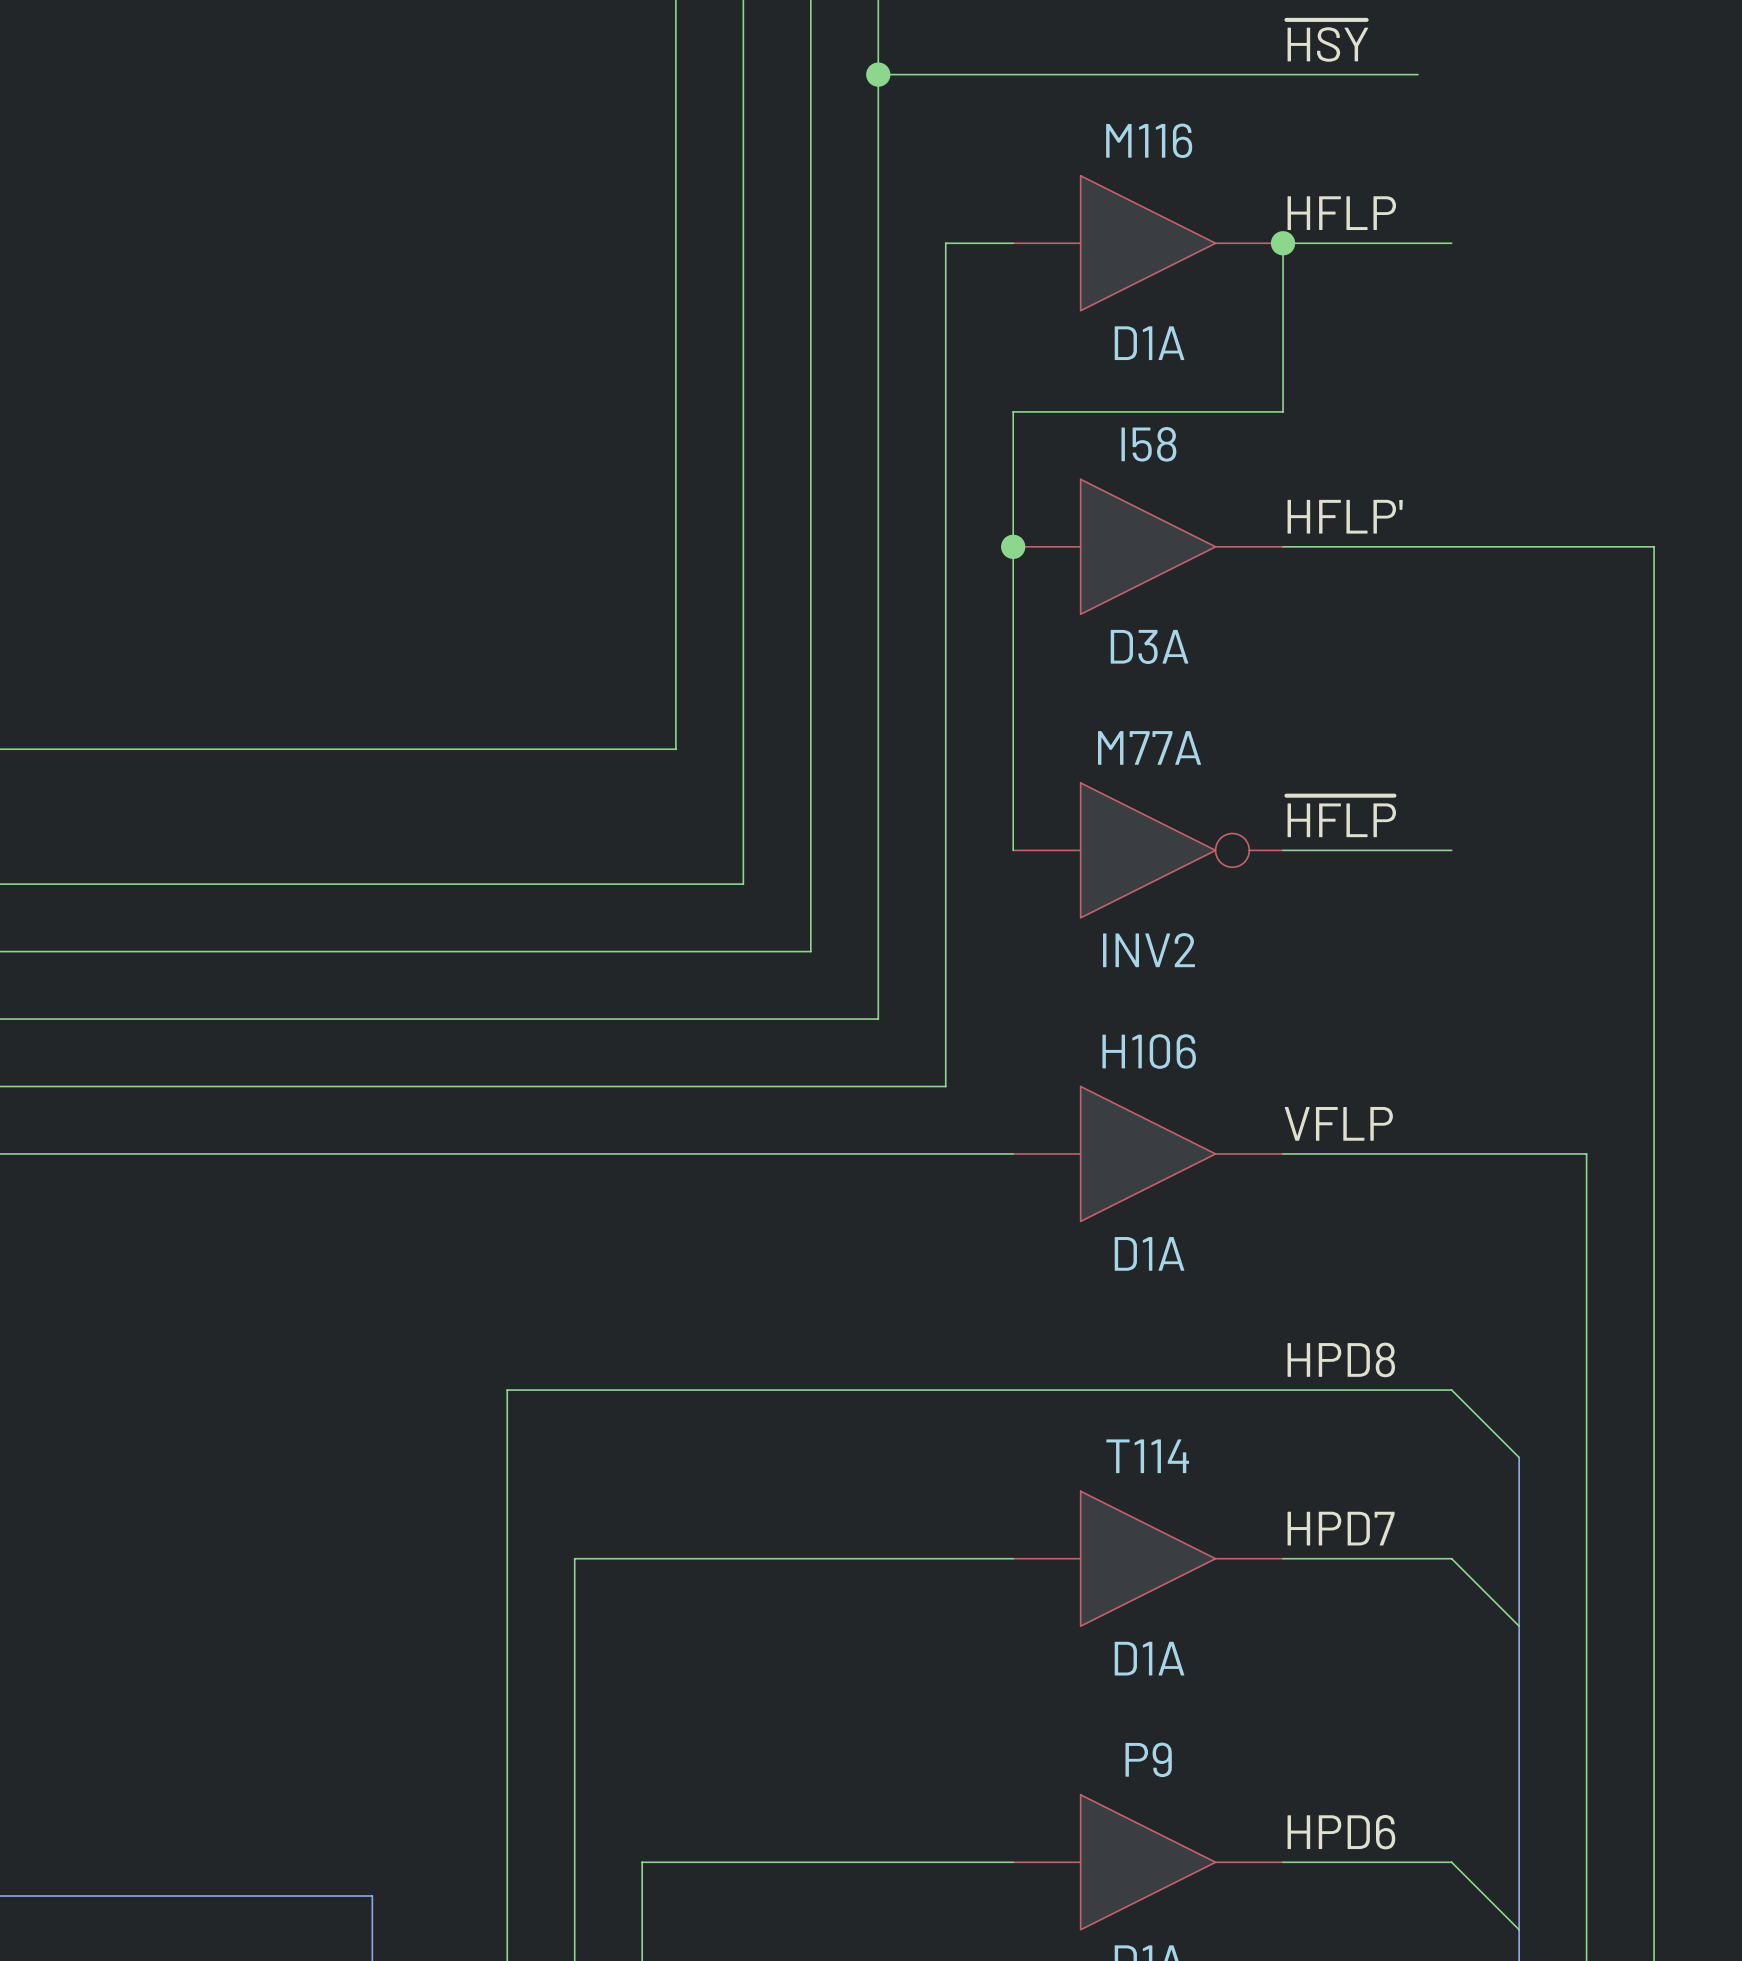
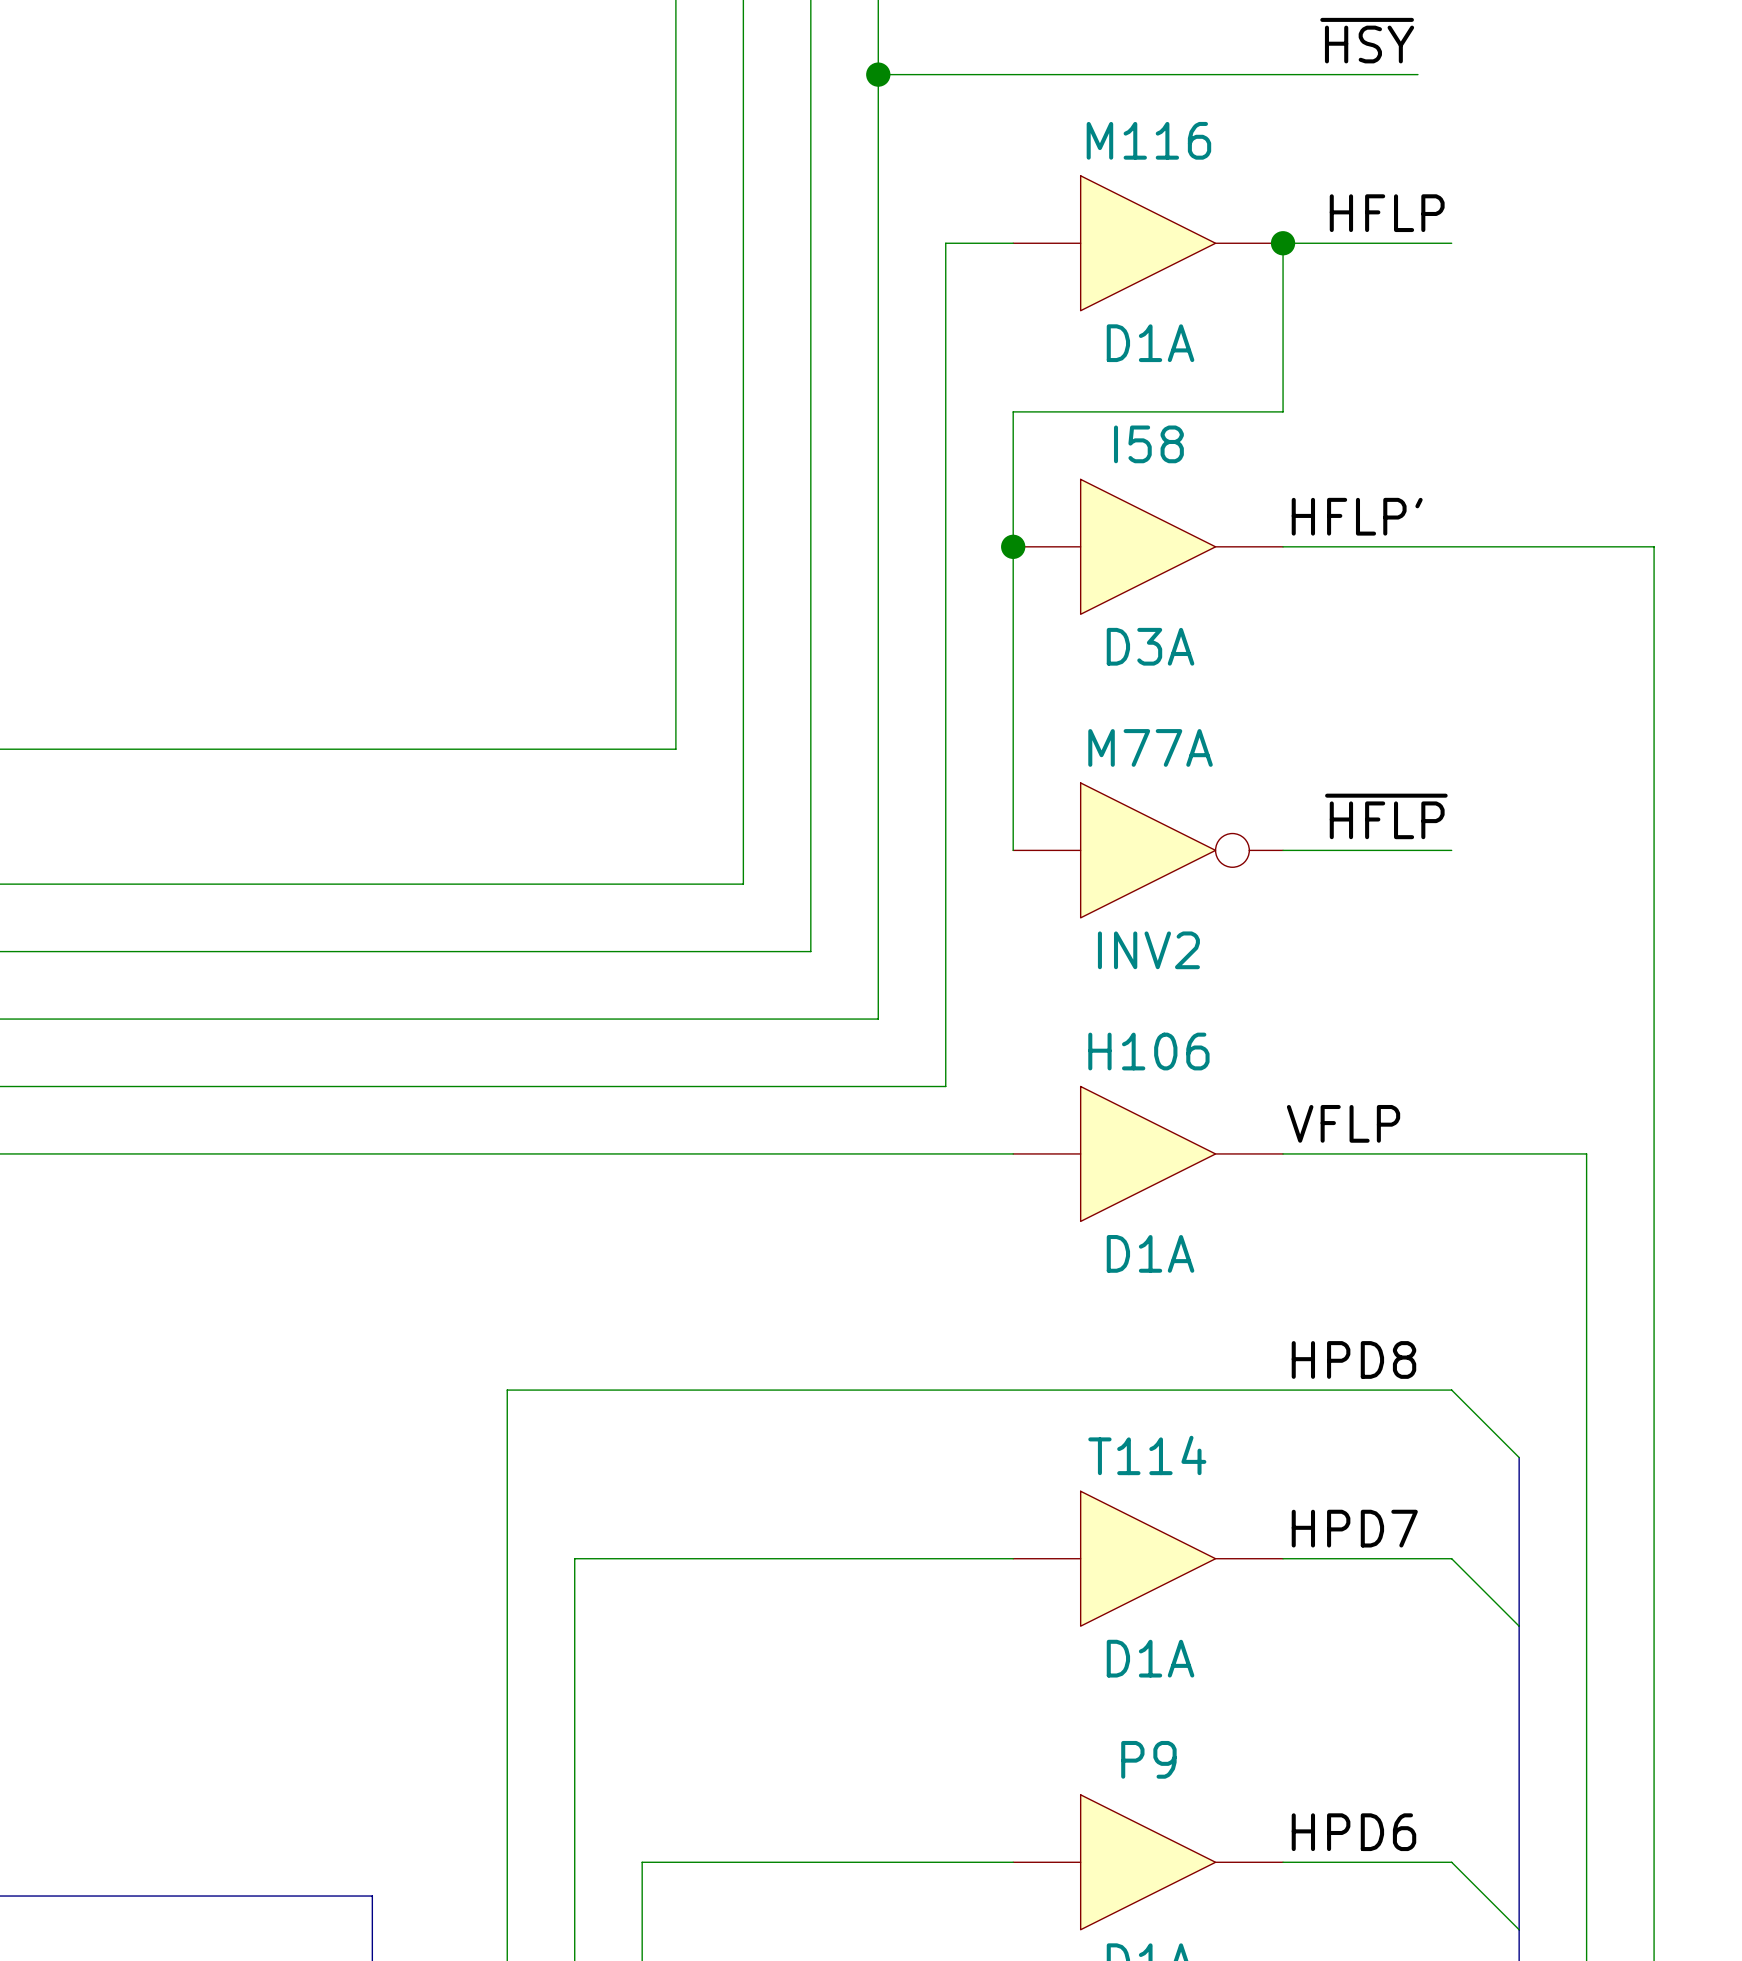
label position: ~{HSY} (1327, 40) -> ~{HSY} (1367, 40)
label position: HFLP (1341, 213) -> HFLP (1387, 213)
label position: ~{HFLP} (1341, 816) -> ~{HFLP} (1386, 816)

